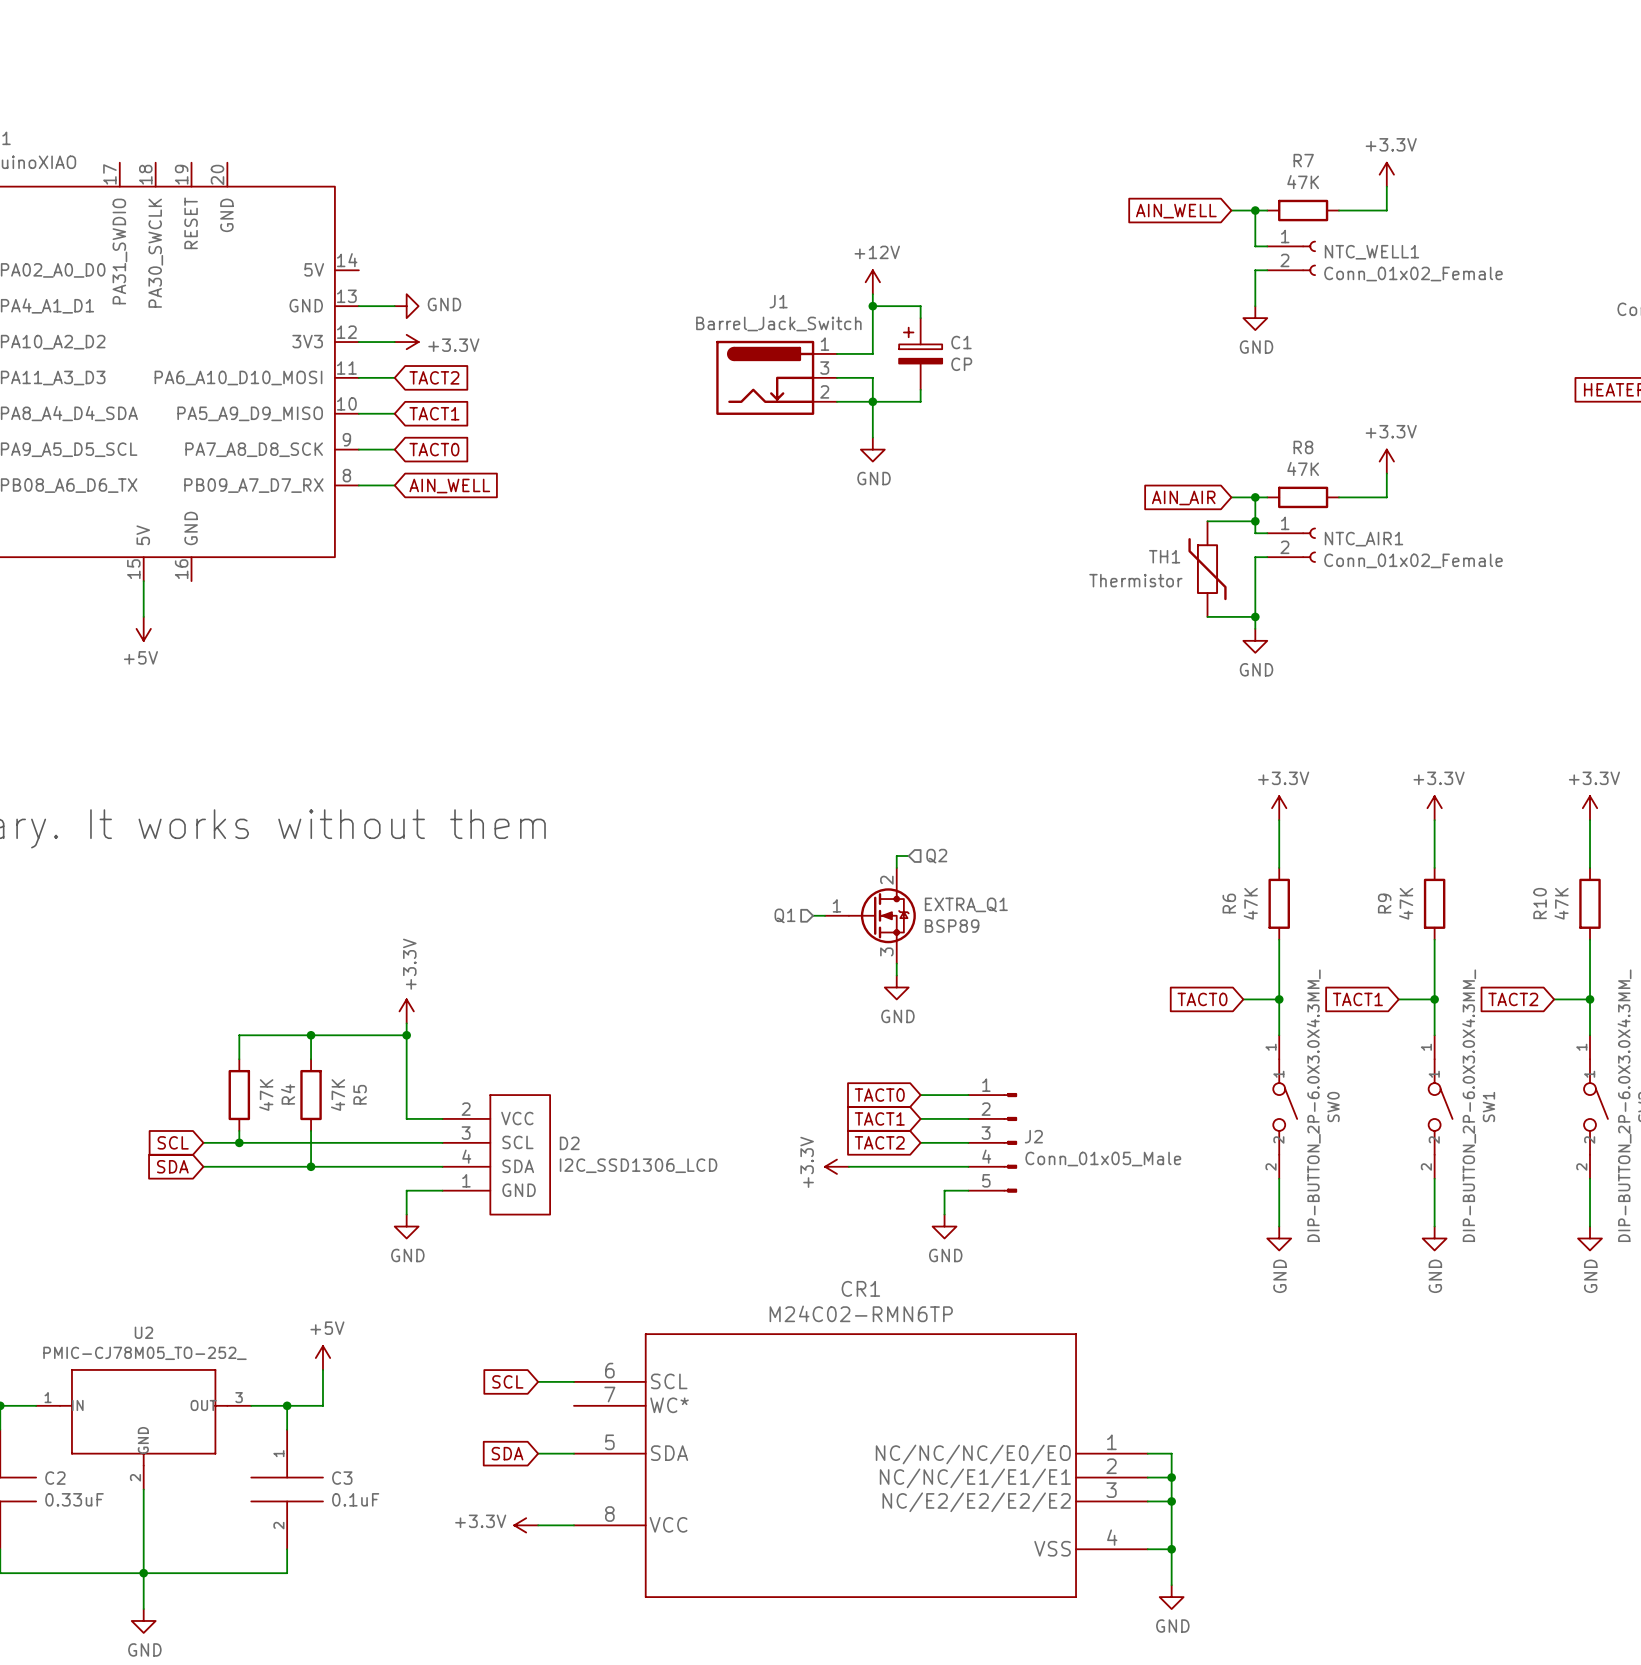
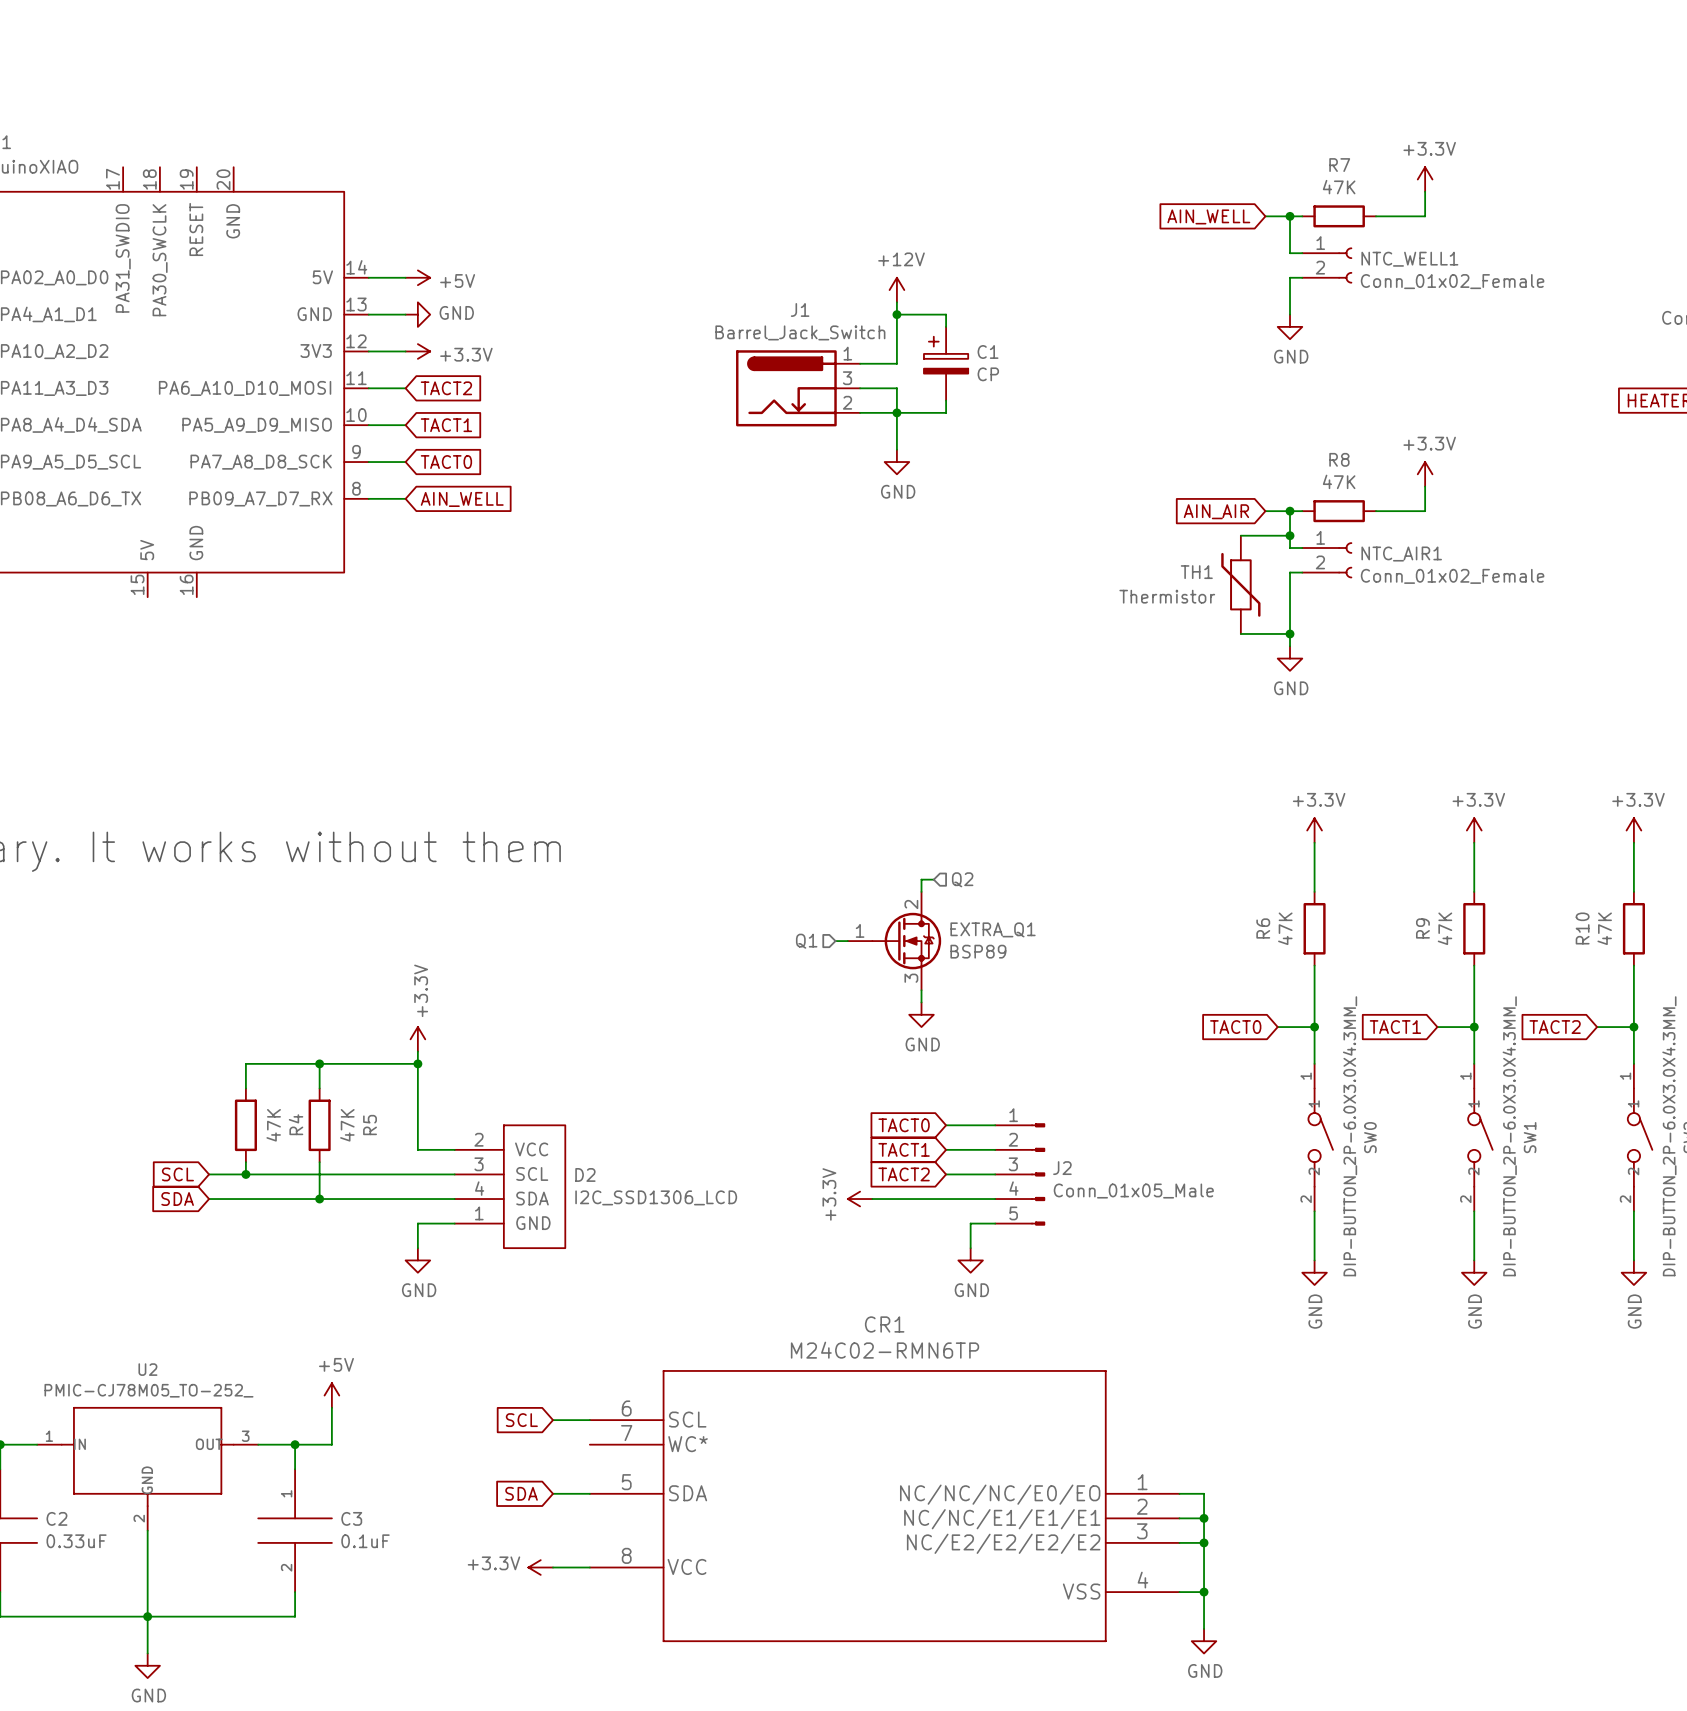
wire: none -> (368, 277) (405, 277)
power symbol: none -> +5V (417, 277)
wire: (143, 581) (143, 616) -> none
power symbol: +5V (143, 628) -> none

